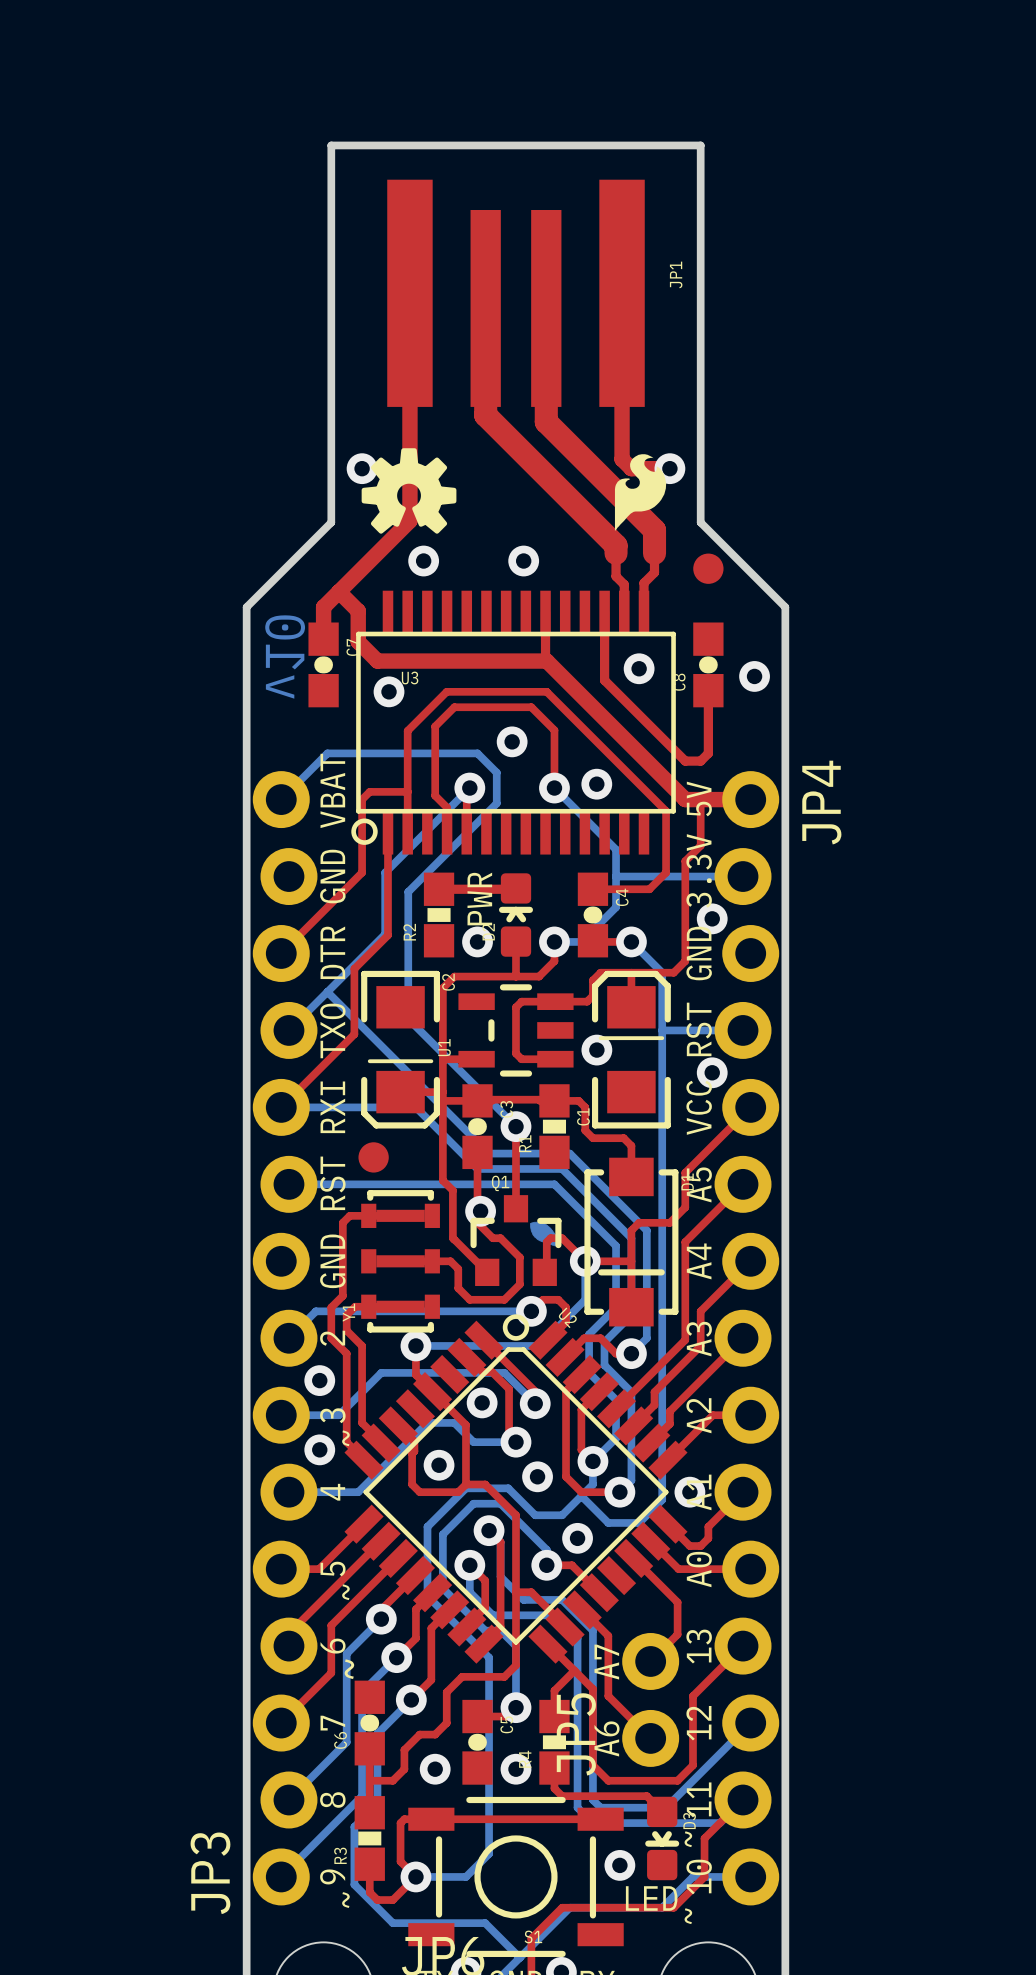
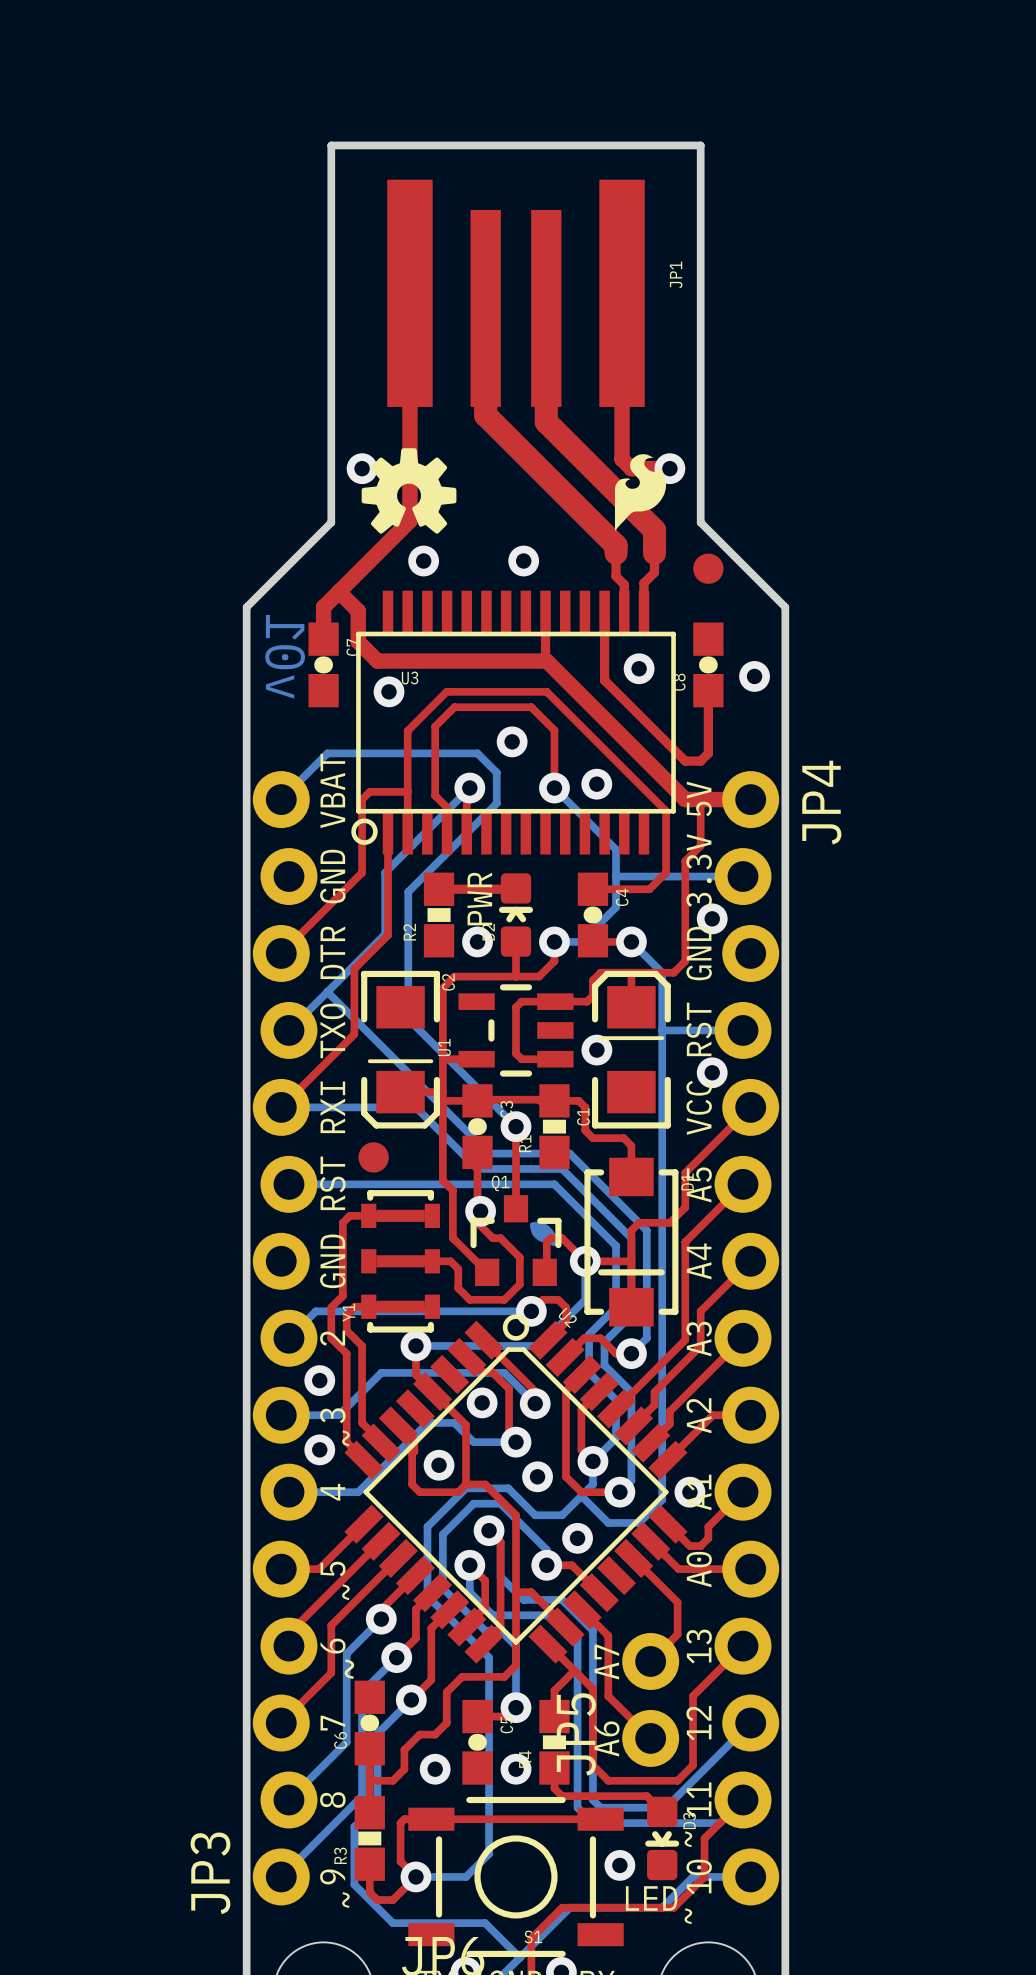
drawing shape: [265, 615, 306, 699] -> [265, 614, 306, 699]

